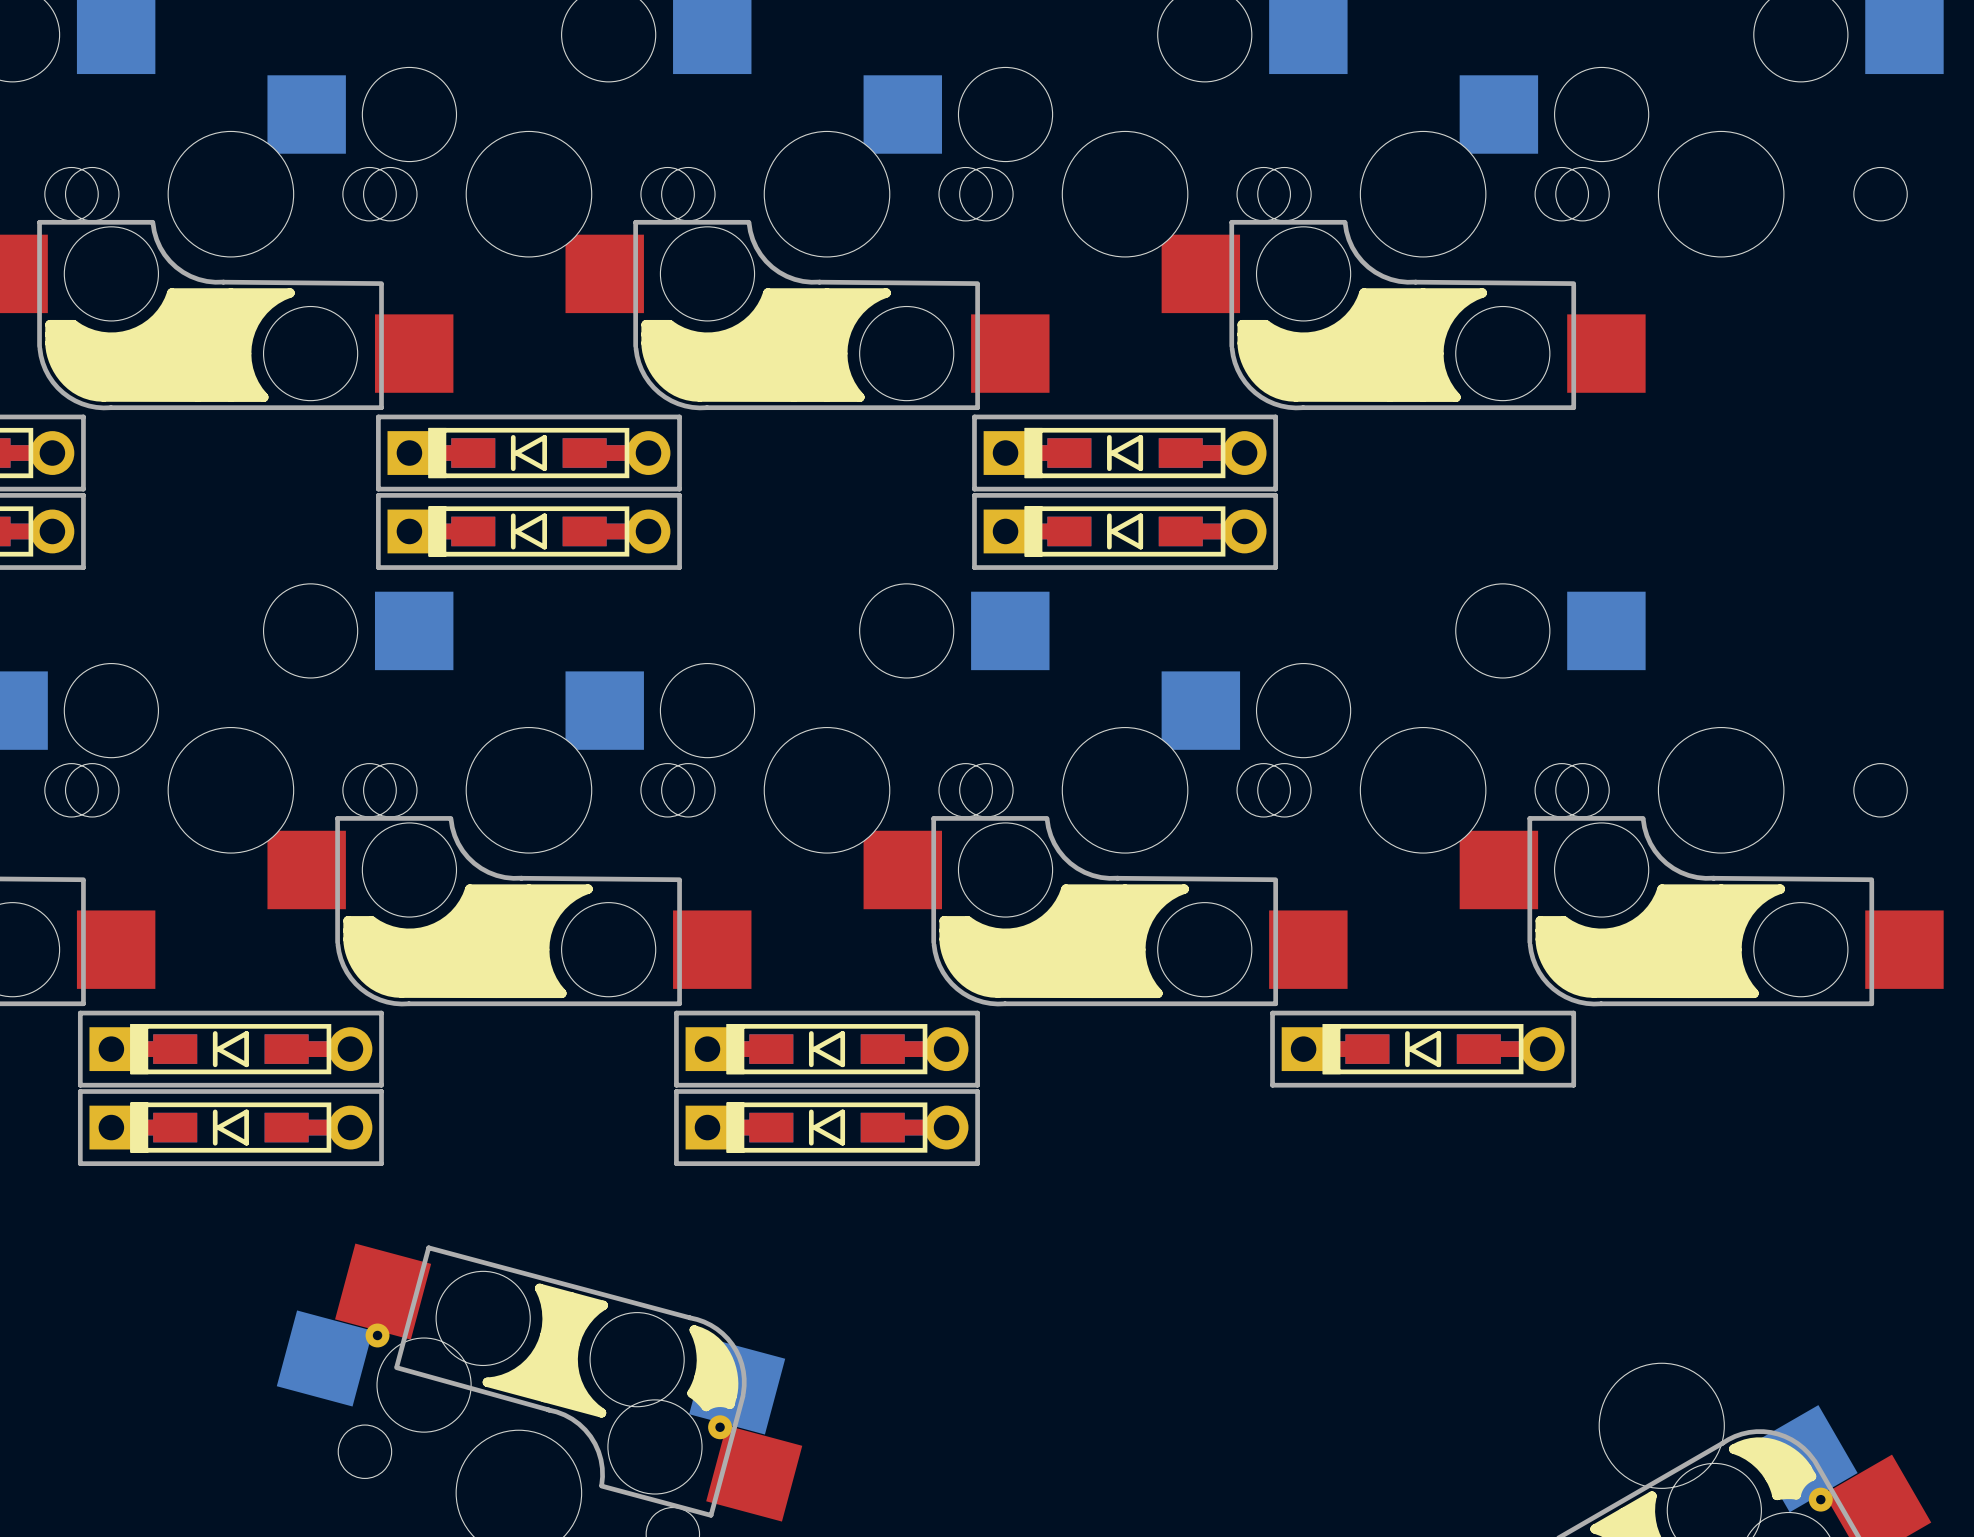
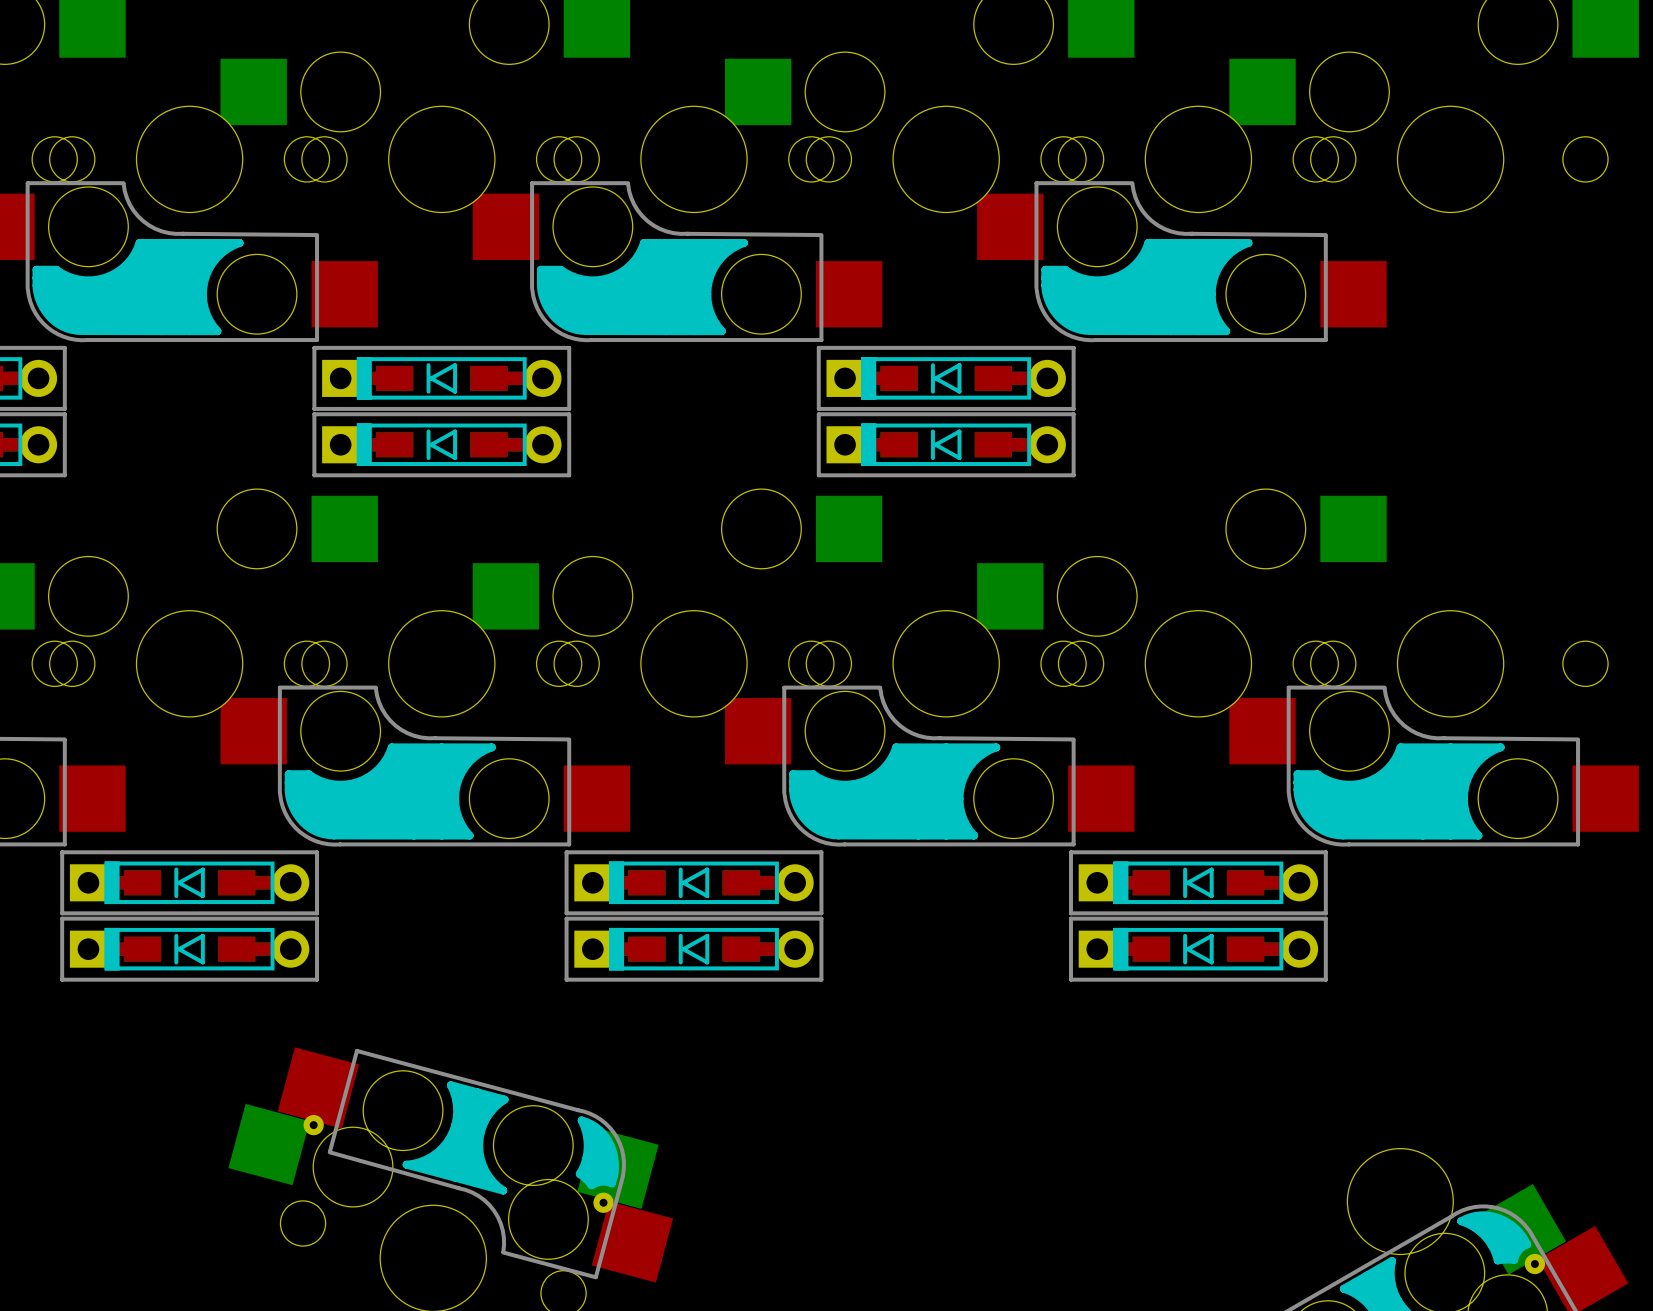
part: none -> (1198, 949)

